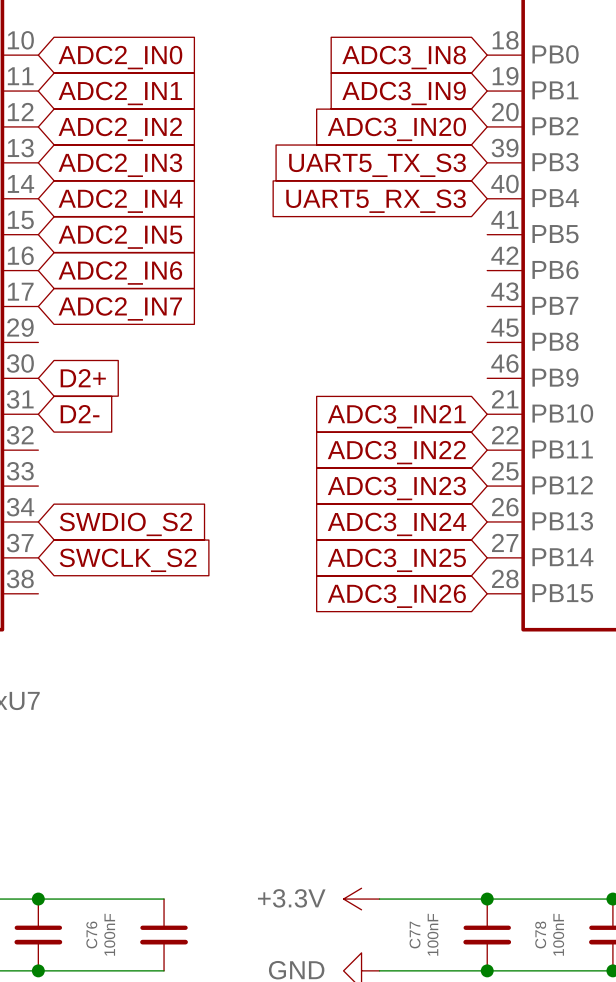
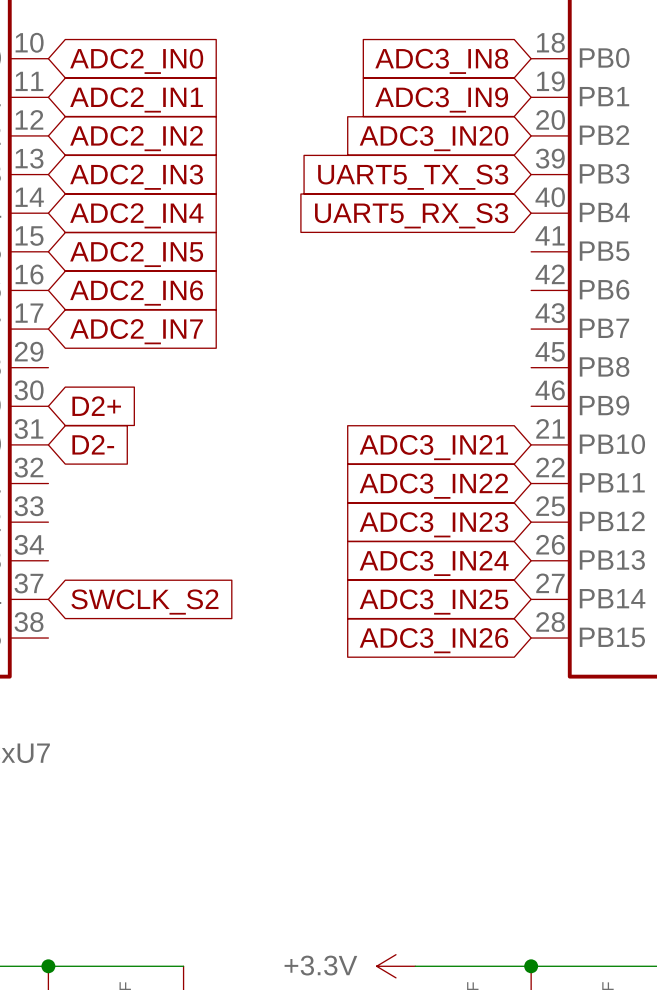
global label: SWDIO_S2 (125, 524) -> none

